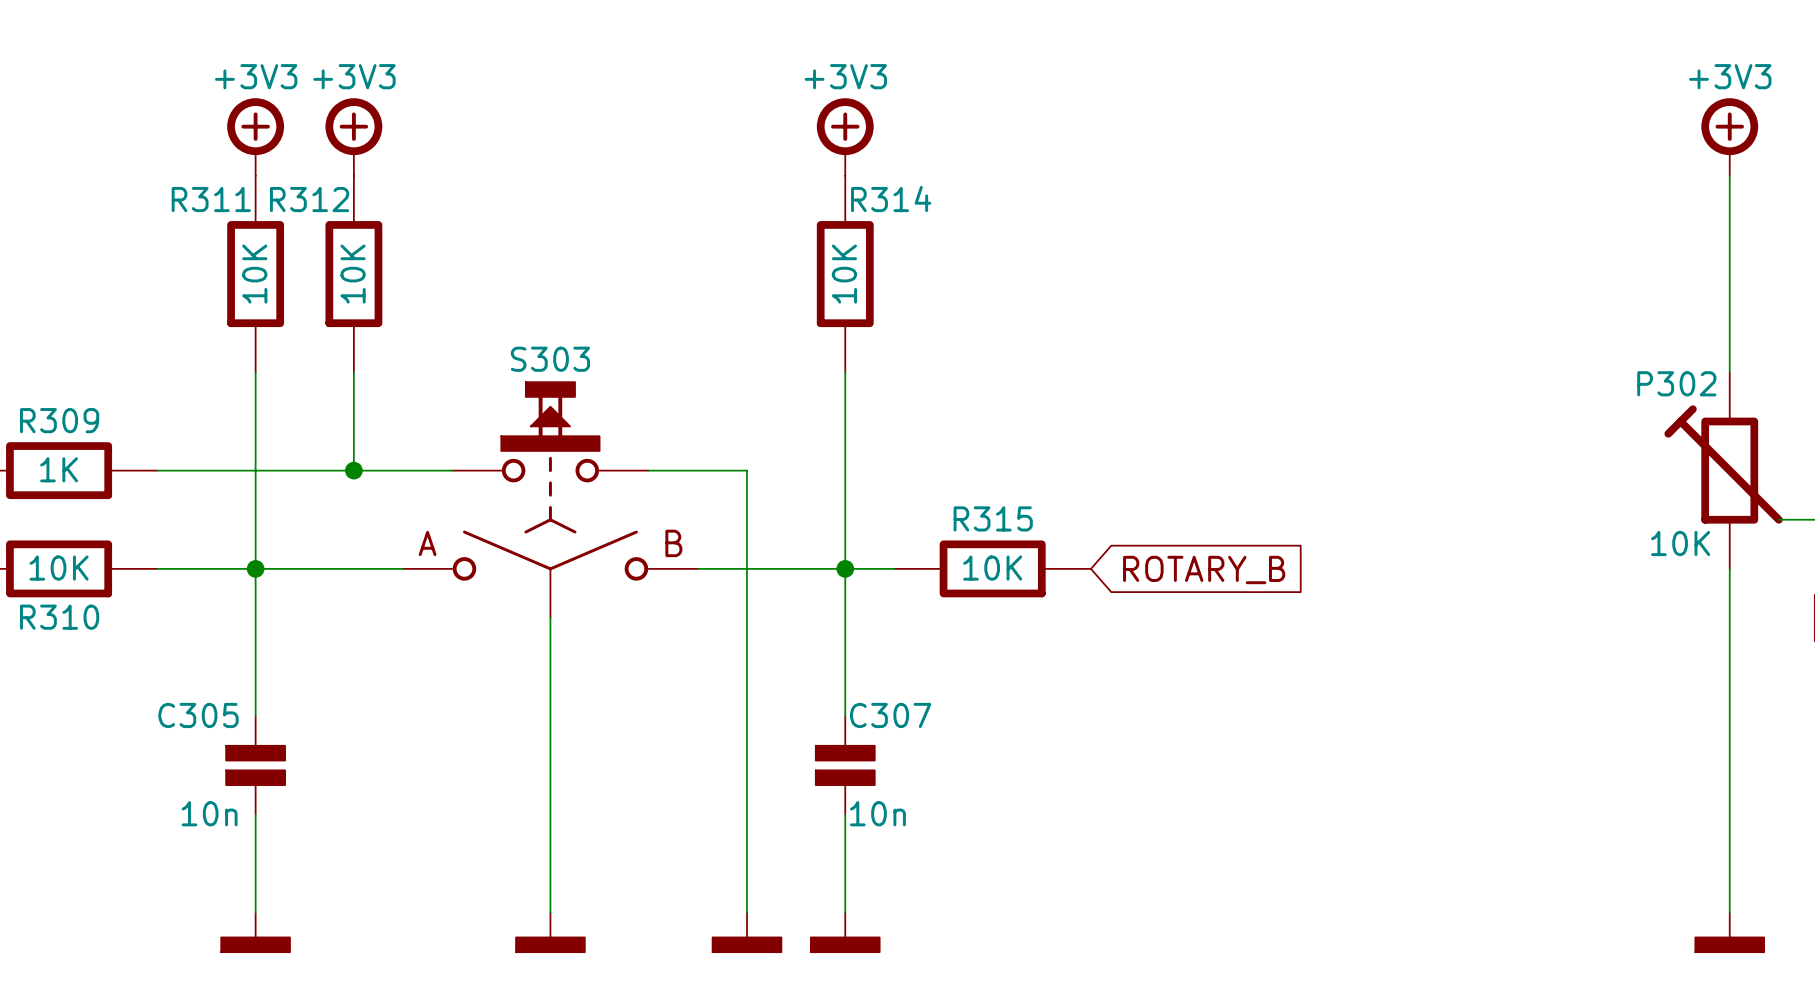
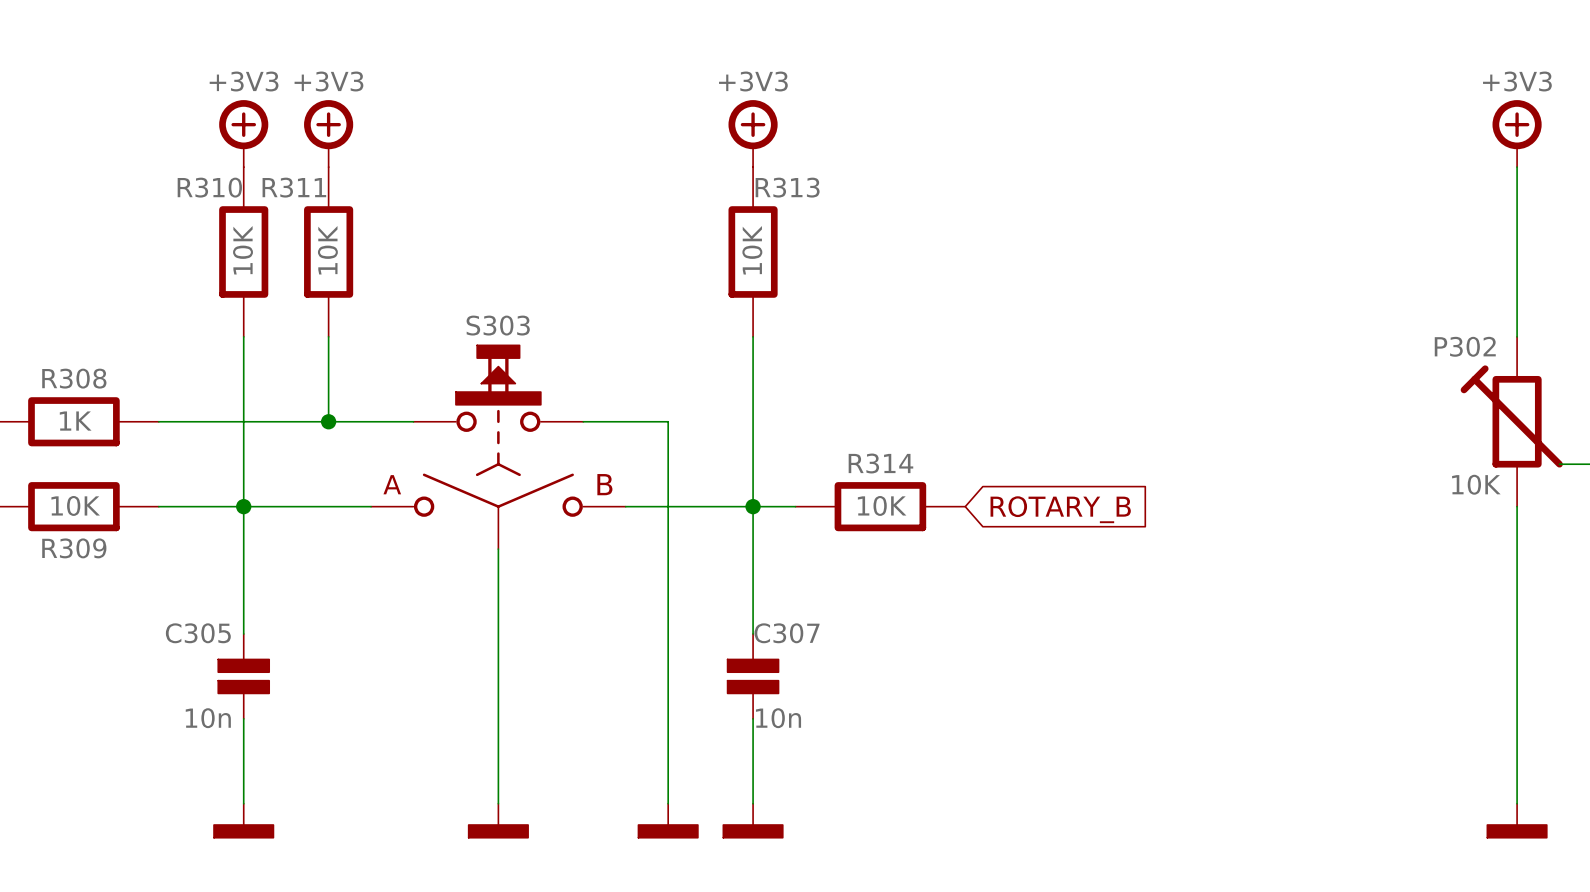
R311 name: R311 (211, 199) -> R310 (209, 187)
R312 name: R312 (309, 199) -> R311 (294, 187)
R314 name: R314 (891, 199) -> R313 (787, 187)
R309 name: R309 (59, 420) -> R308 (74, 378)
R315 name: R315 (993, 518) -> R314 (880, 463)
R310 name: R310 (59, 617) -> R309 (74, 548)

